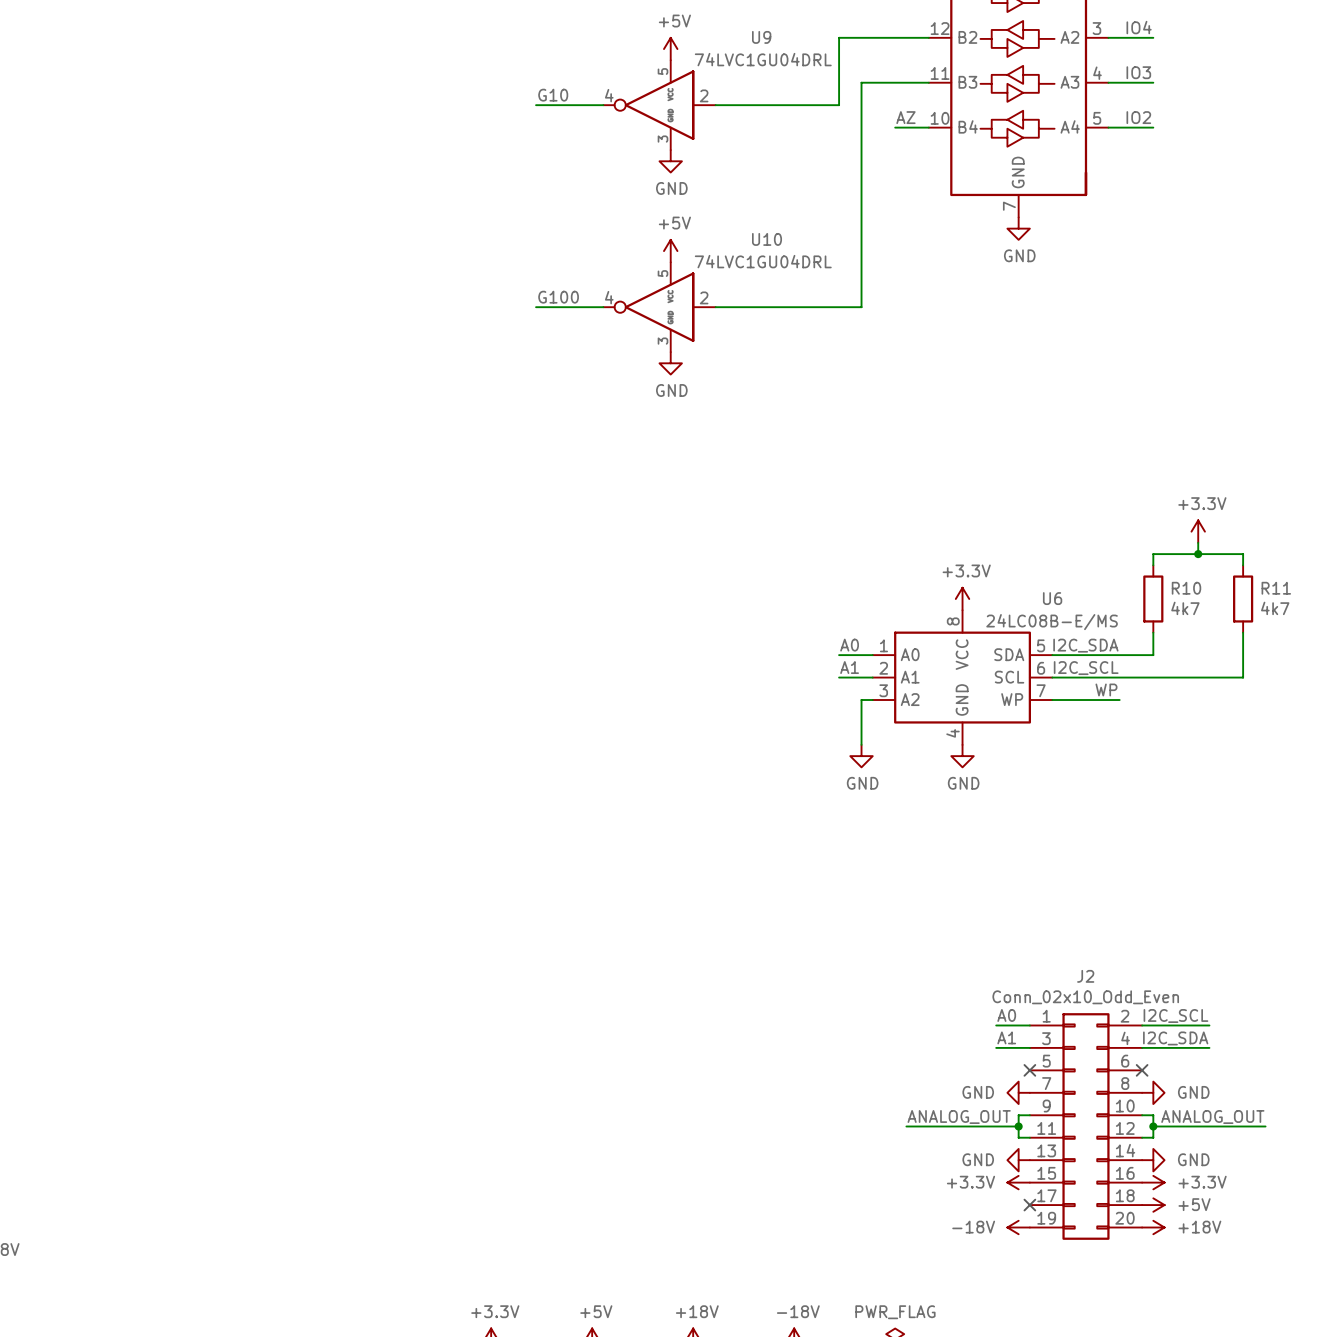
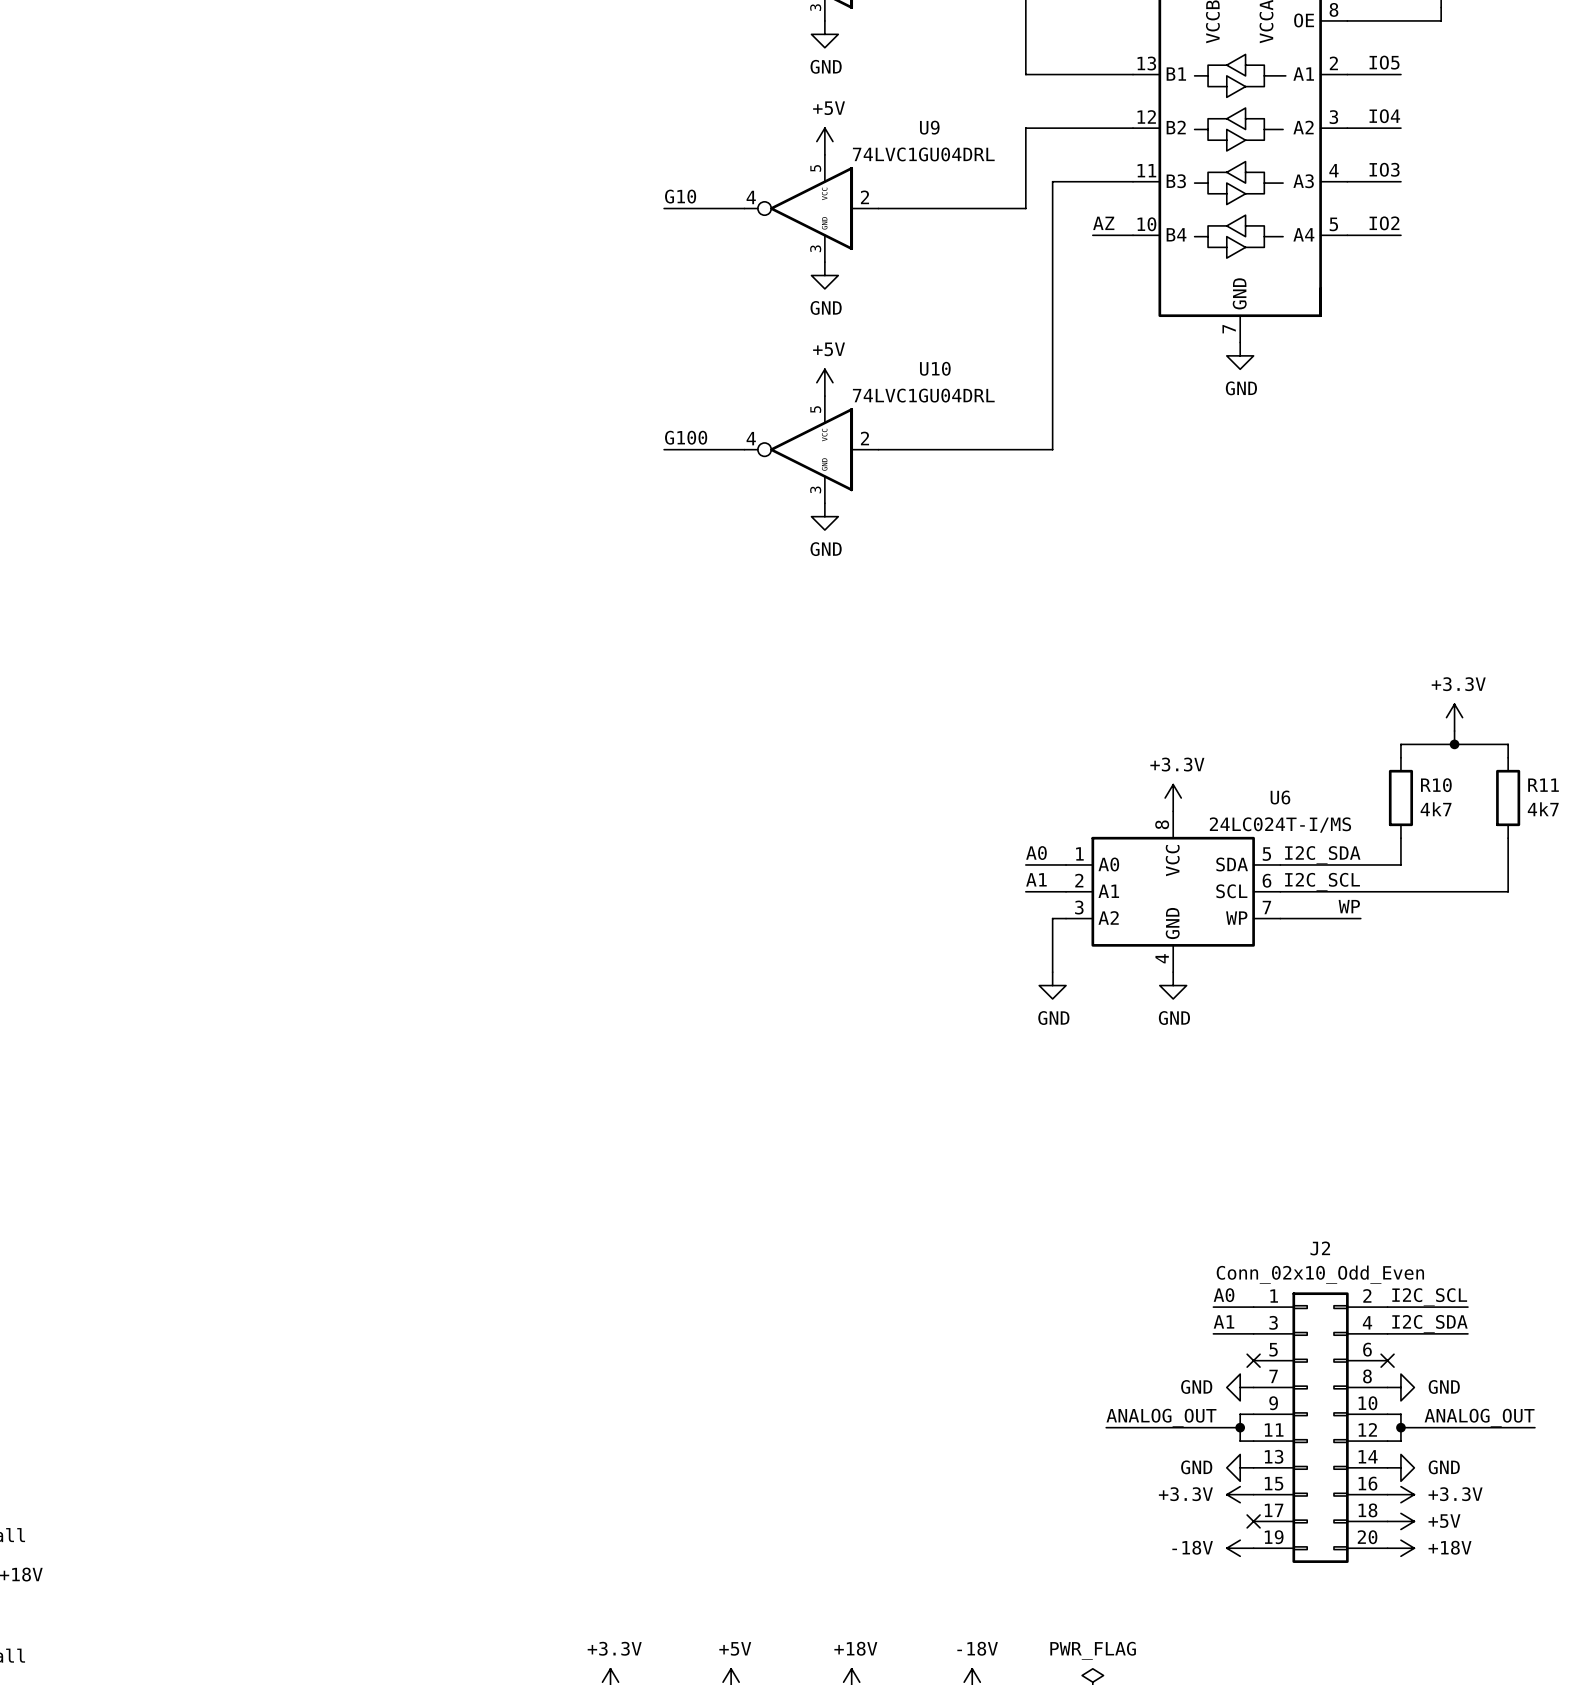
U6 value: 24LC08B-E/MS (1052, 622) -> 24LC024T-I/MS (1280, 825)

